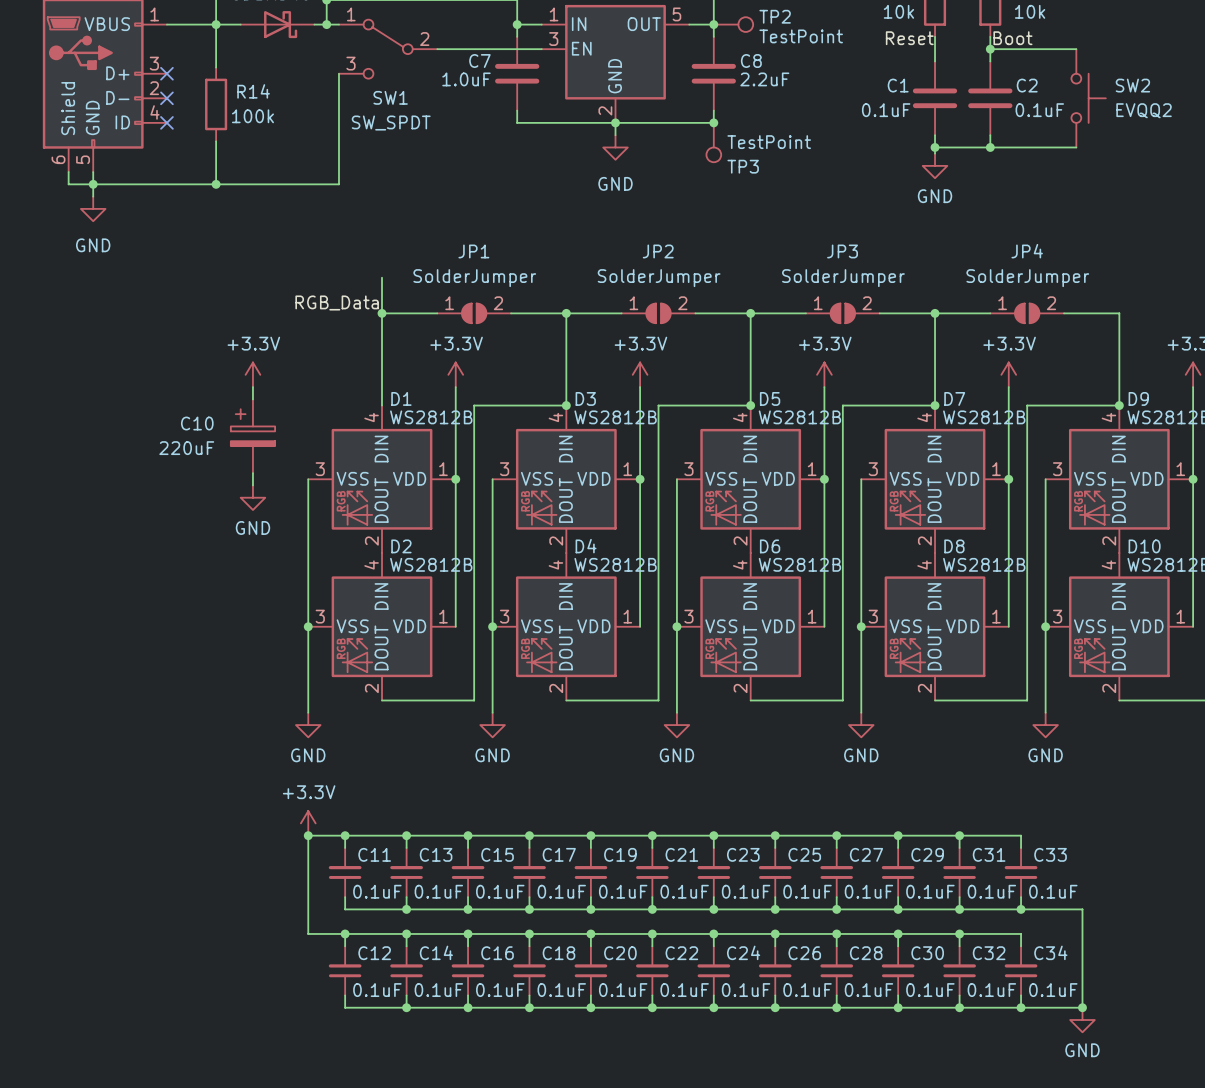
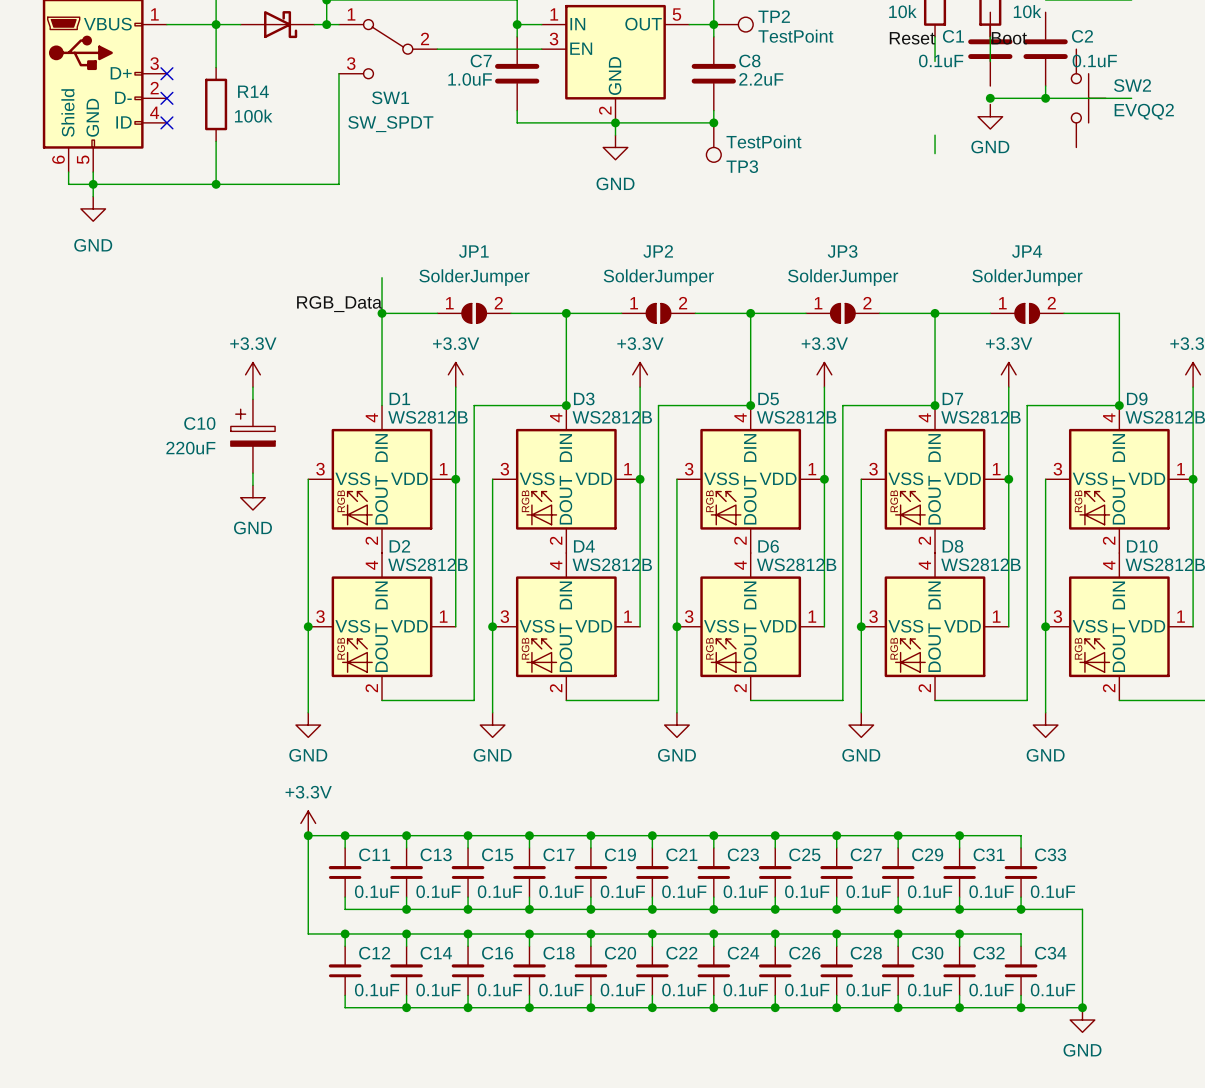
wire: (990, 49) (1076, 49) -> (1045, 0) (1131, 0)
junction: (990, 49) -> none
C1 position: (935, 98) -> (990, 49)
junction: none -> (990, 98)
C2 position: (990, 98) -> (1045, 49)
junction: none -> (1045, 98)
wire: (990, 135) (990, 147) -> (1045, 86) (1045, 98)
wire: (935, 147) (1076, 147) -> (990, 98) (1131, 98)
junction: (935, 147) -> none
junction: (990, 147) -> none
power symbol position: GND (935, 165) -> GND (990, 116)

